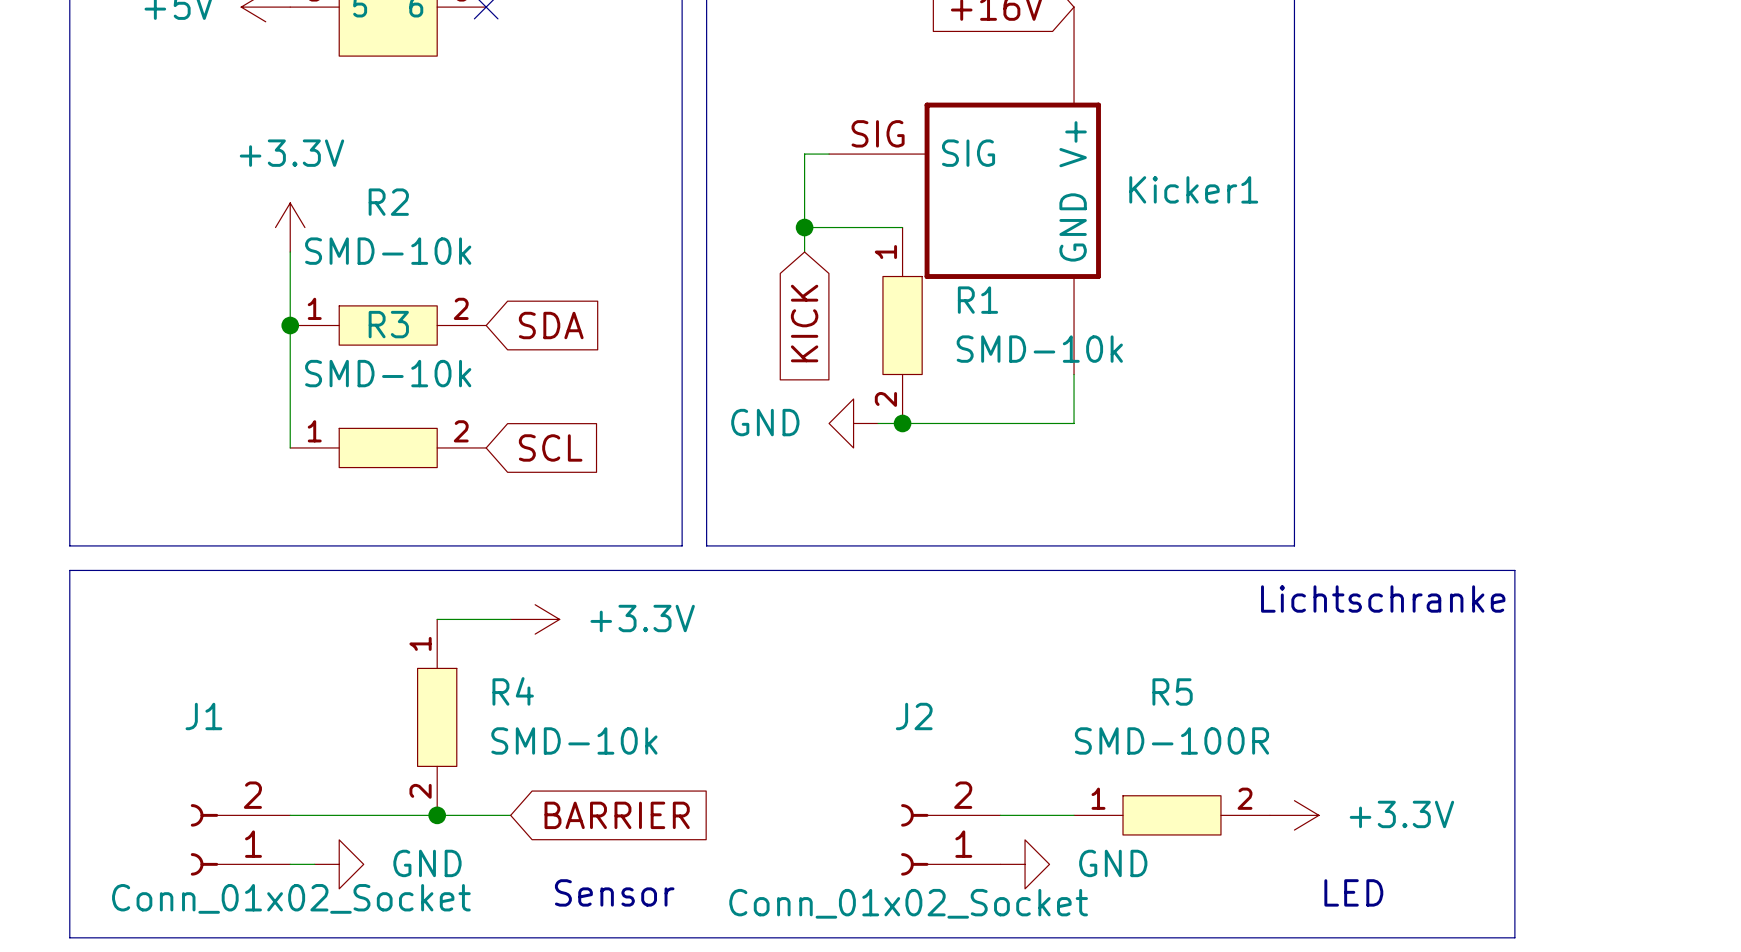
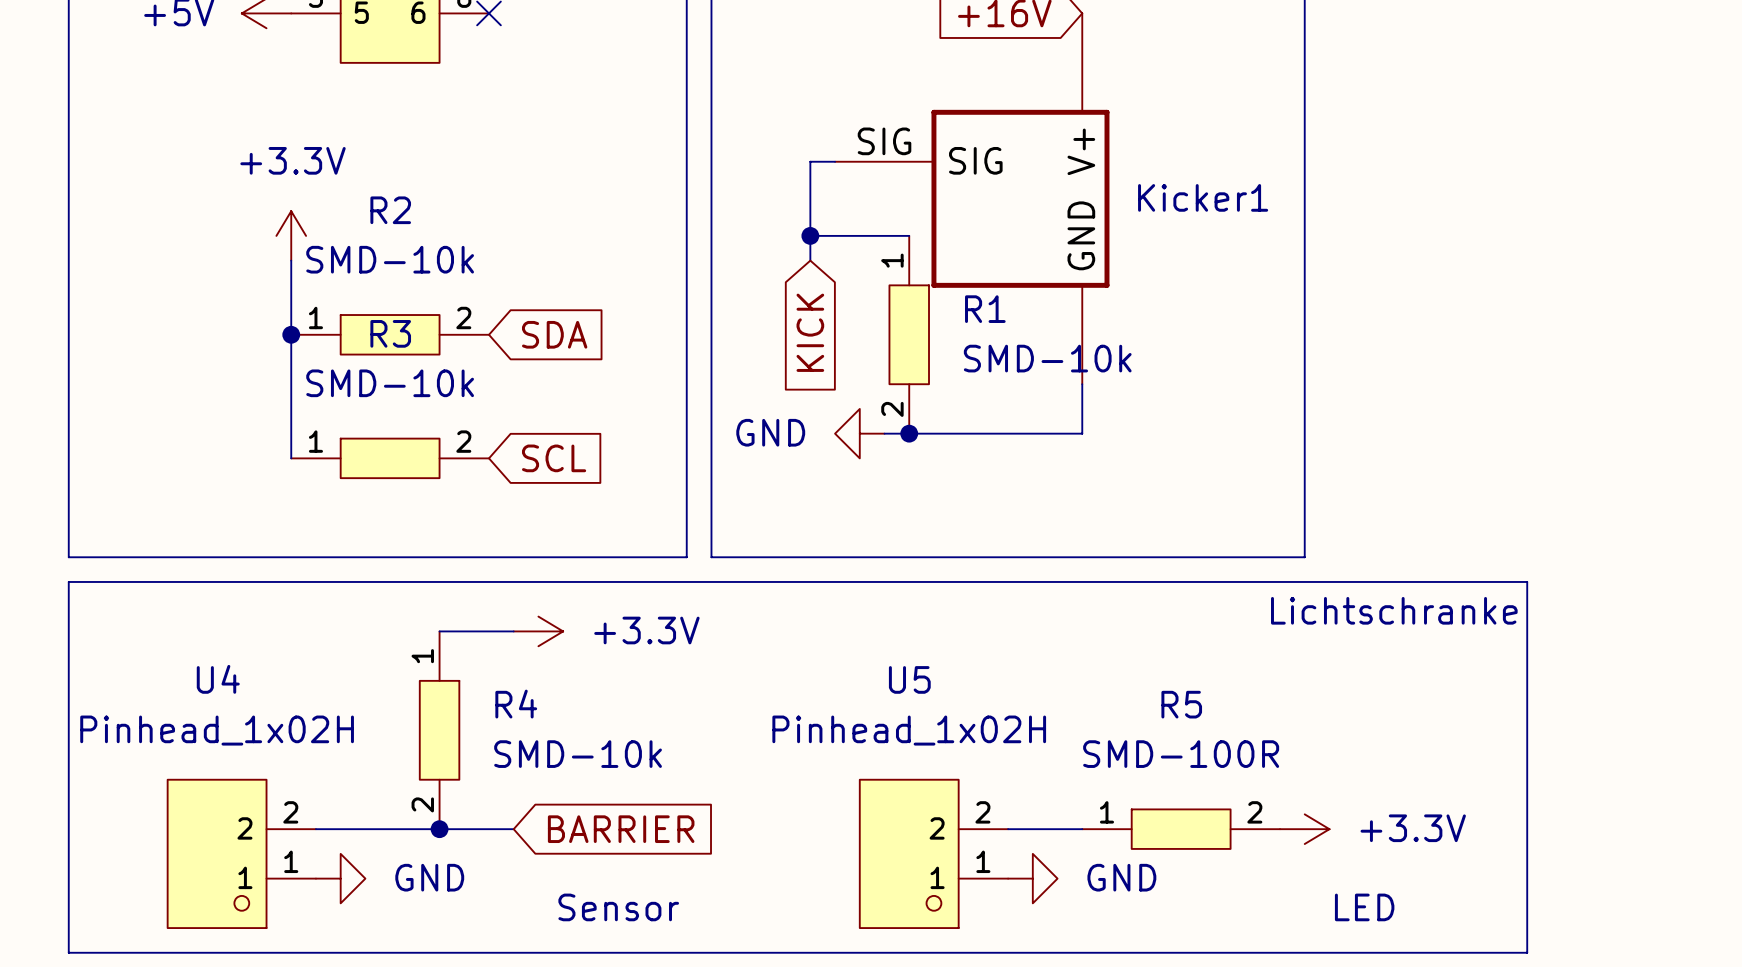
J1: Conn_01x02_Socket (240, 839) -> none
U4: none -> Pinhead_1x02H (241, 853)
U5: none -> Pinhead_1x02H (933, 853)
J2: Conn_01x02_Socket (950, 839) -> none

